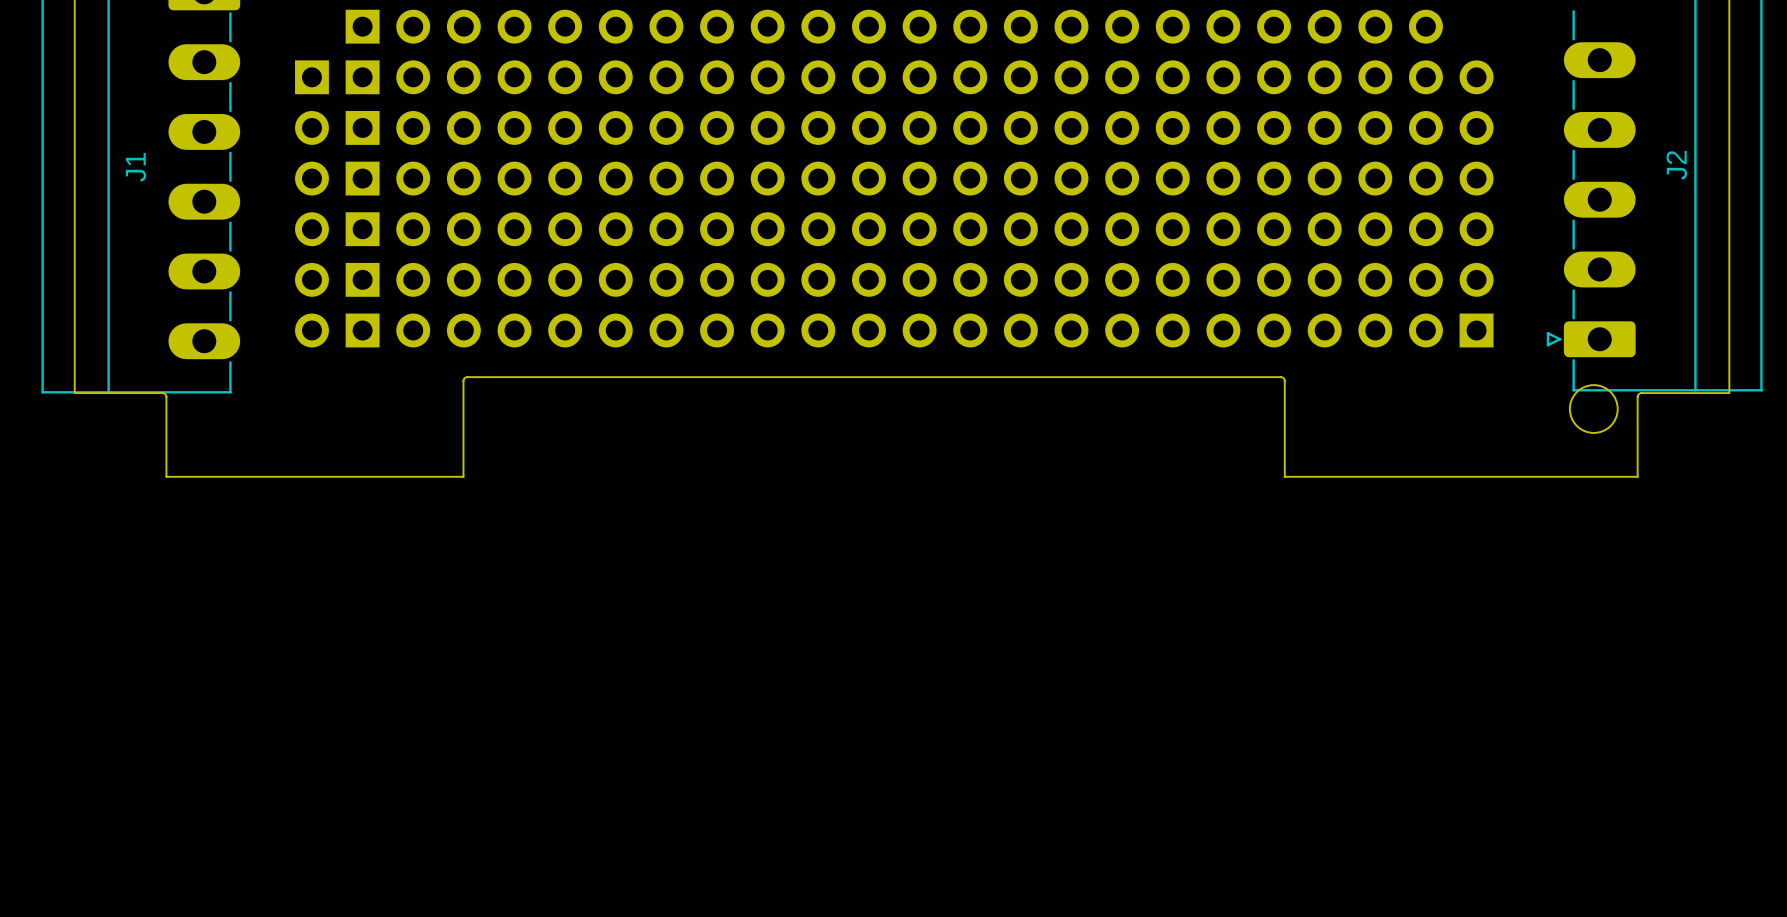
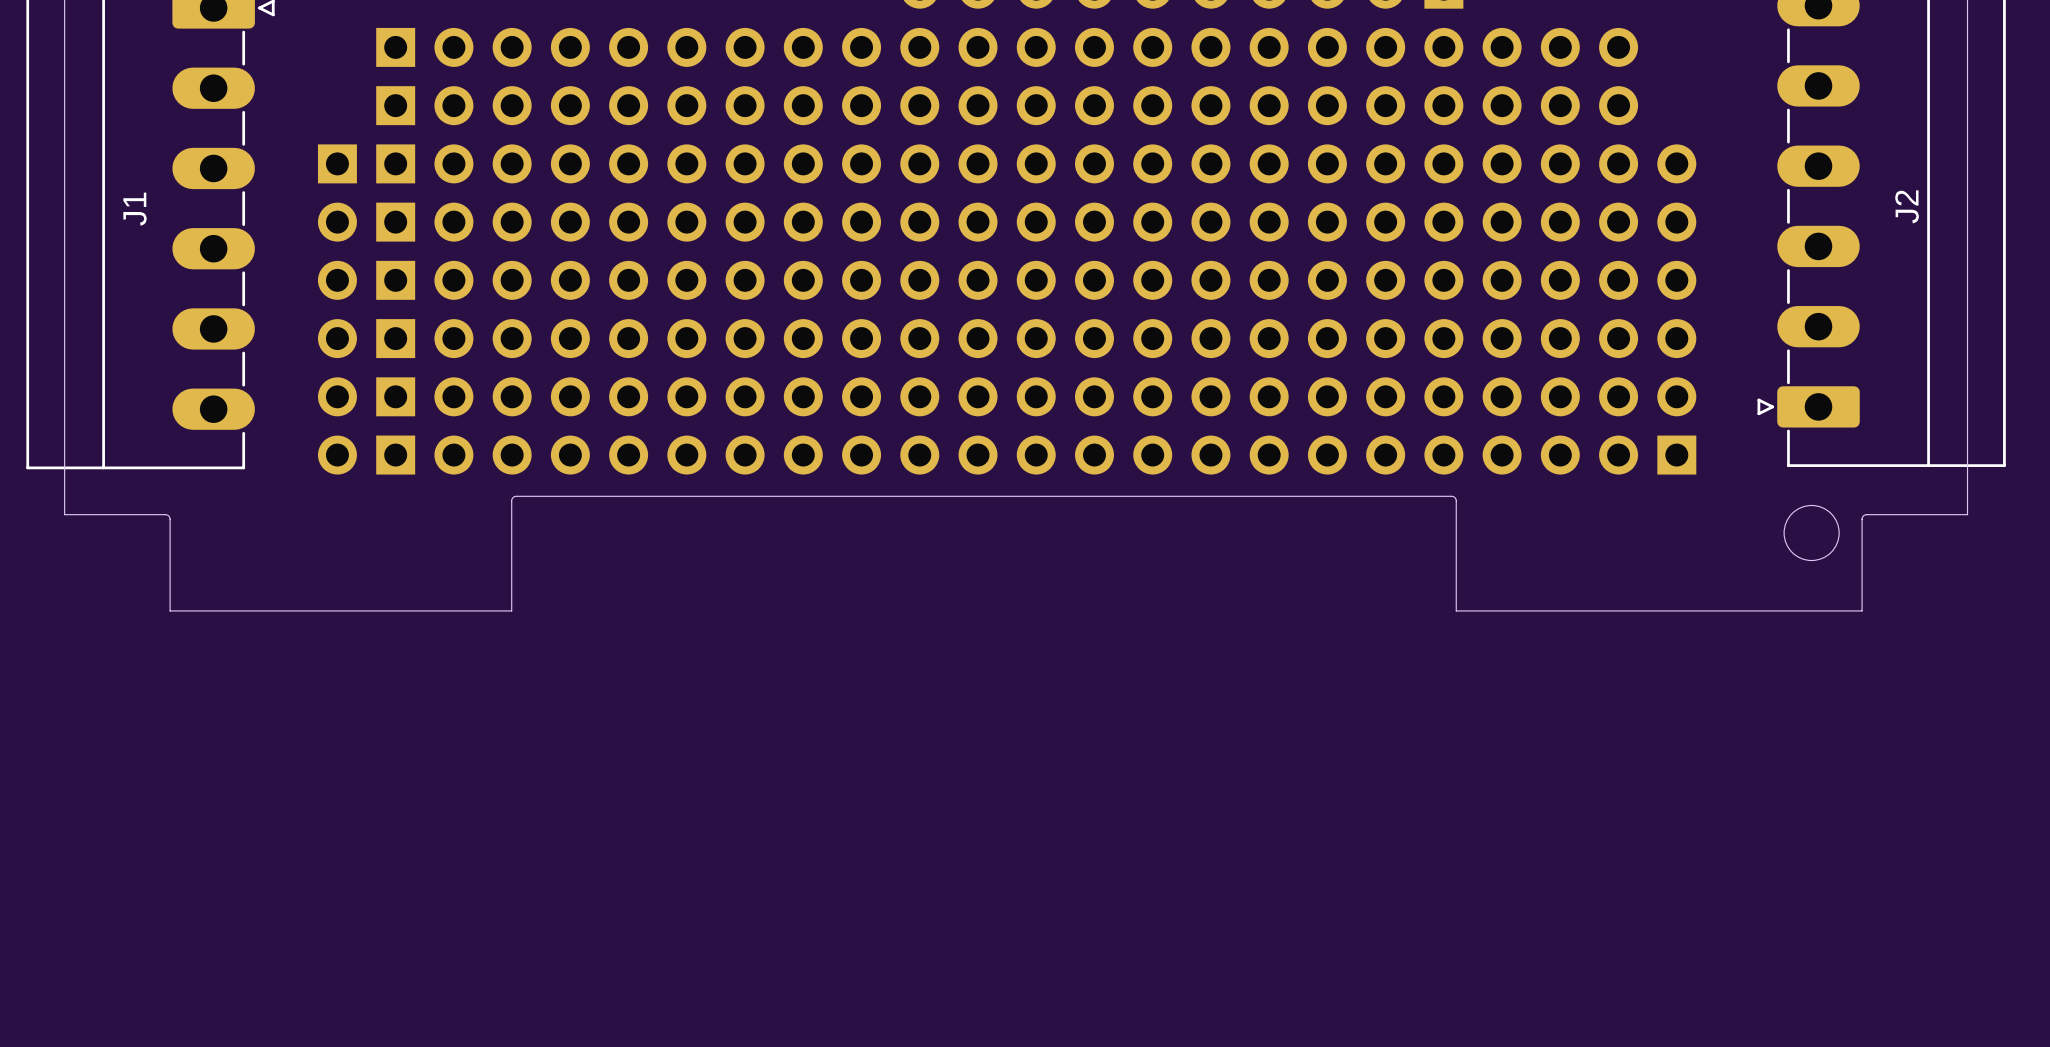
part position: (311, 203) -> (337, 309)
part position: (1476, 203) -> (1676, 309)
part: none -> (1007, 455)
board edge: (74, 393) (163, 393) (166, 397) (166, 436) -> (64, 468) (64, 514) (165, 514) (170, 519)
board edge: (1729, 393) (1640, 393) (1637, 397) (1637, 436) -> (1967, 468) (1967, 514) (1866, 514) (1862, 519)
round board edge position: (1593, 409) -> (1811, 533)
board edge: (463, 420) (463, 380) (467, 377) (1280, 377) (1284, 380) (1284, 420) -> (511, 500) (516, 496) (1451, 496) (1456, 500)
board edge: (166, 476) (463, 476) -> (170, 565) (170, 610) (511, 610) (511, 565)
board edge: (1284, 476) (1637, 476) -> (1456, 565) (1456, 610) (1862, 610) (1862, 565)

